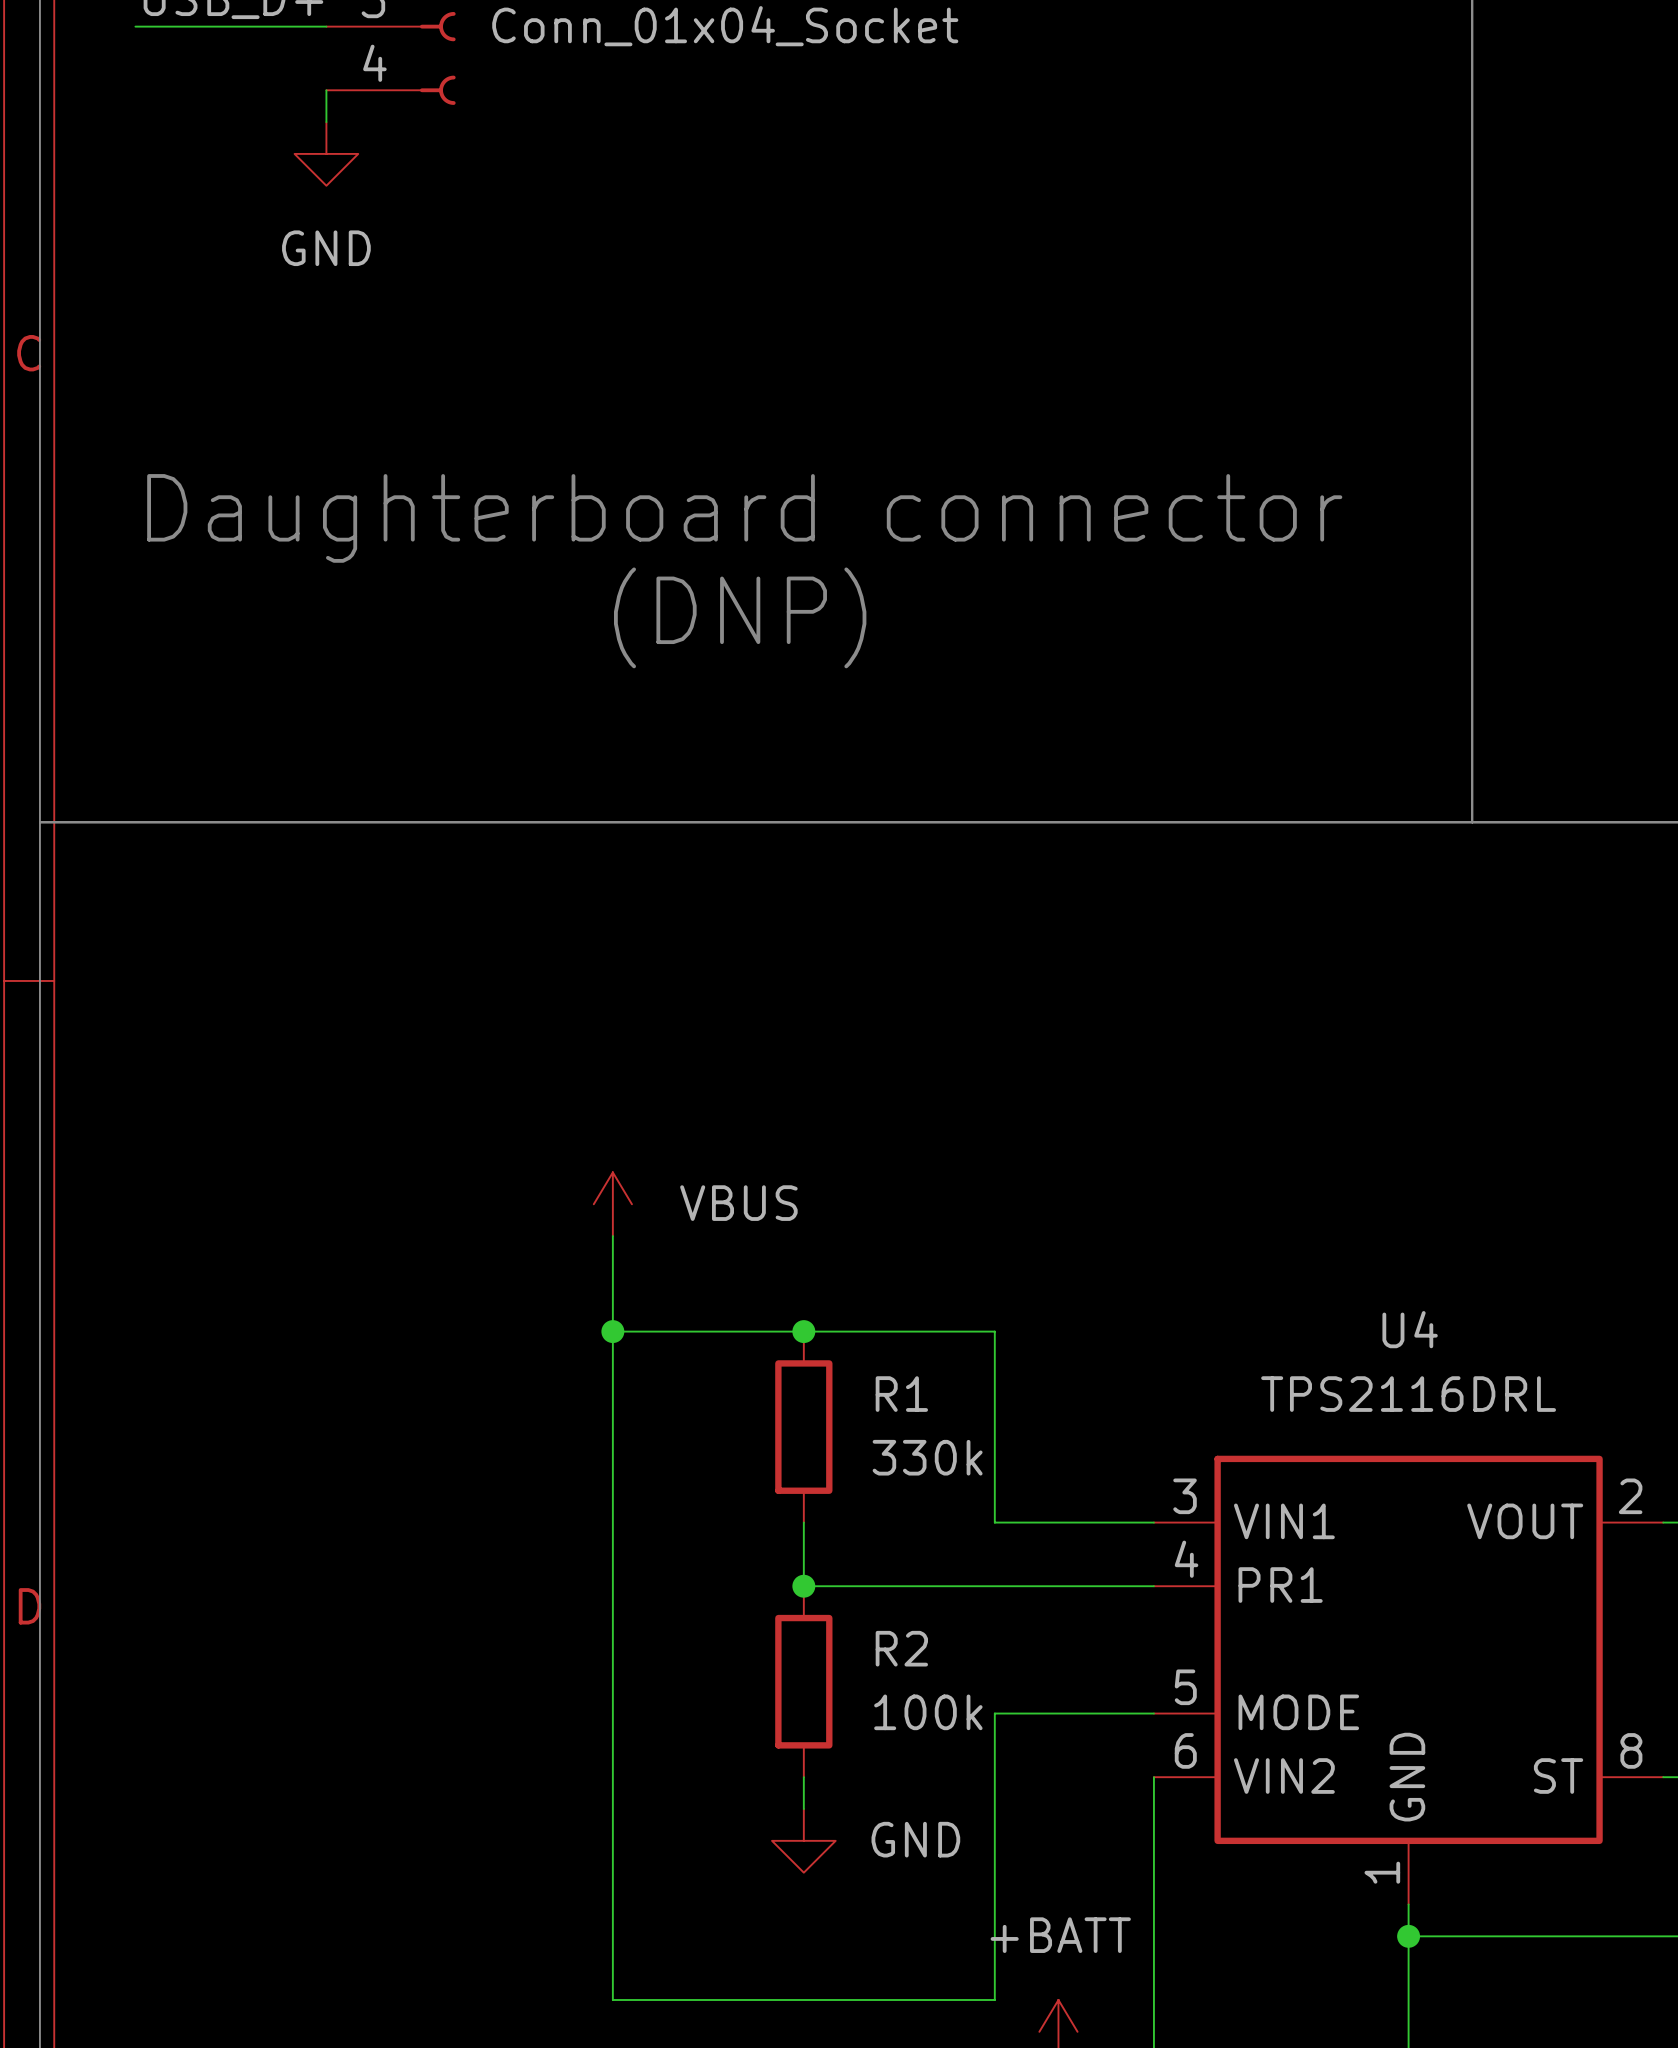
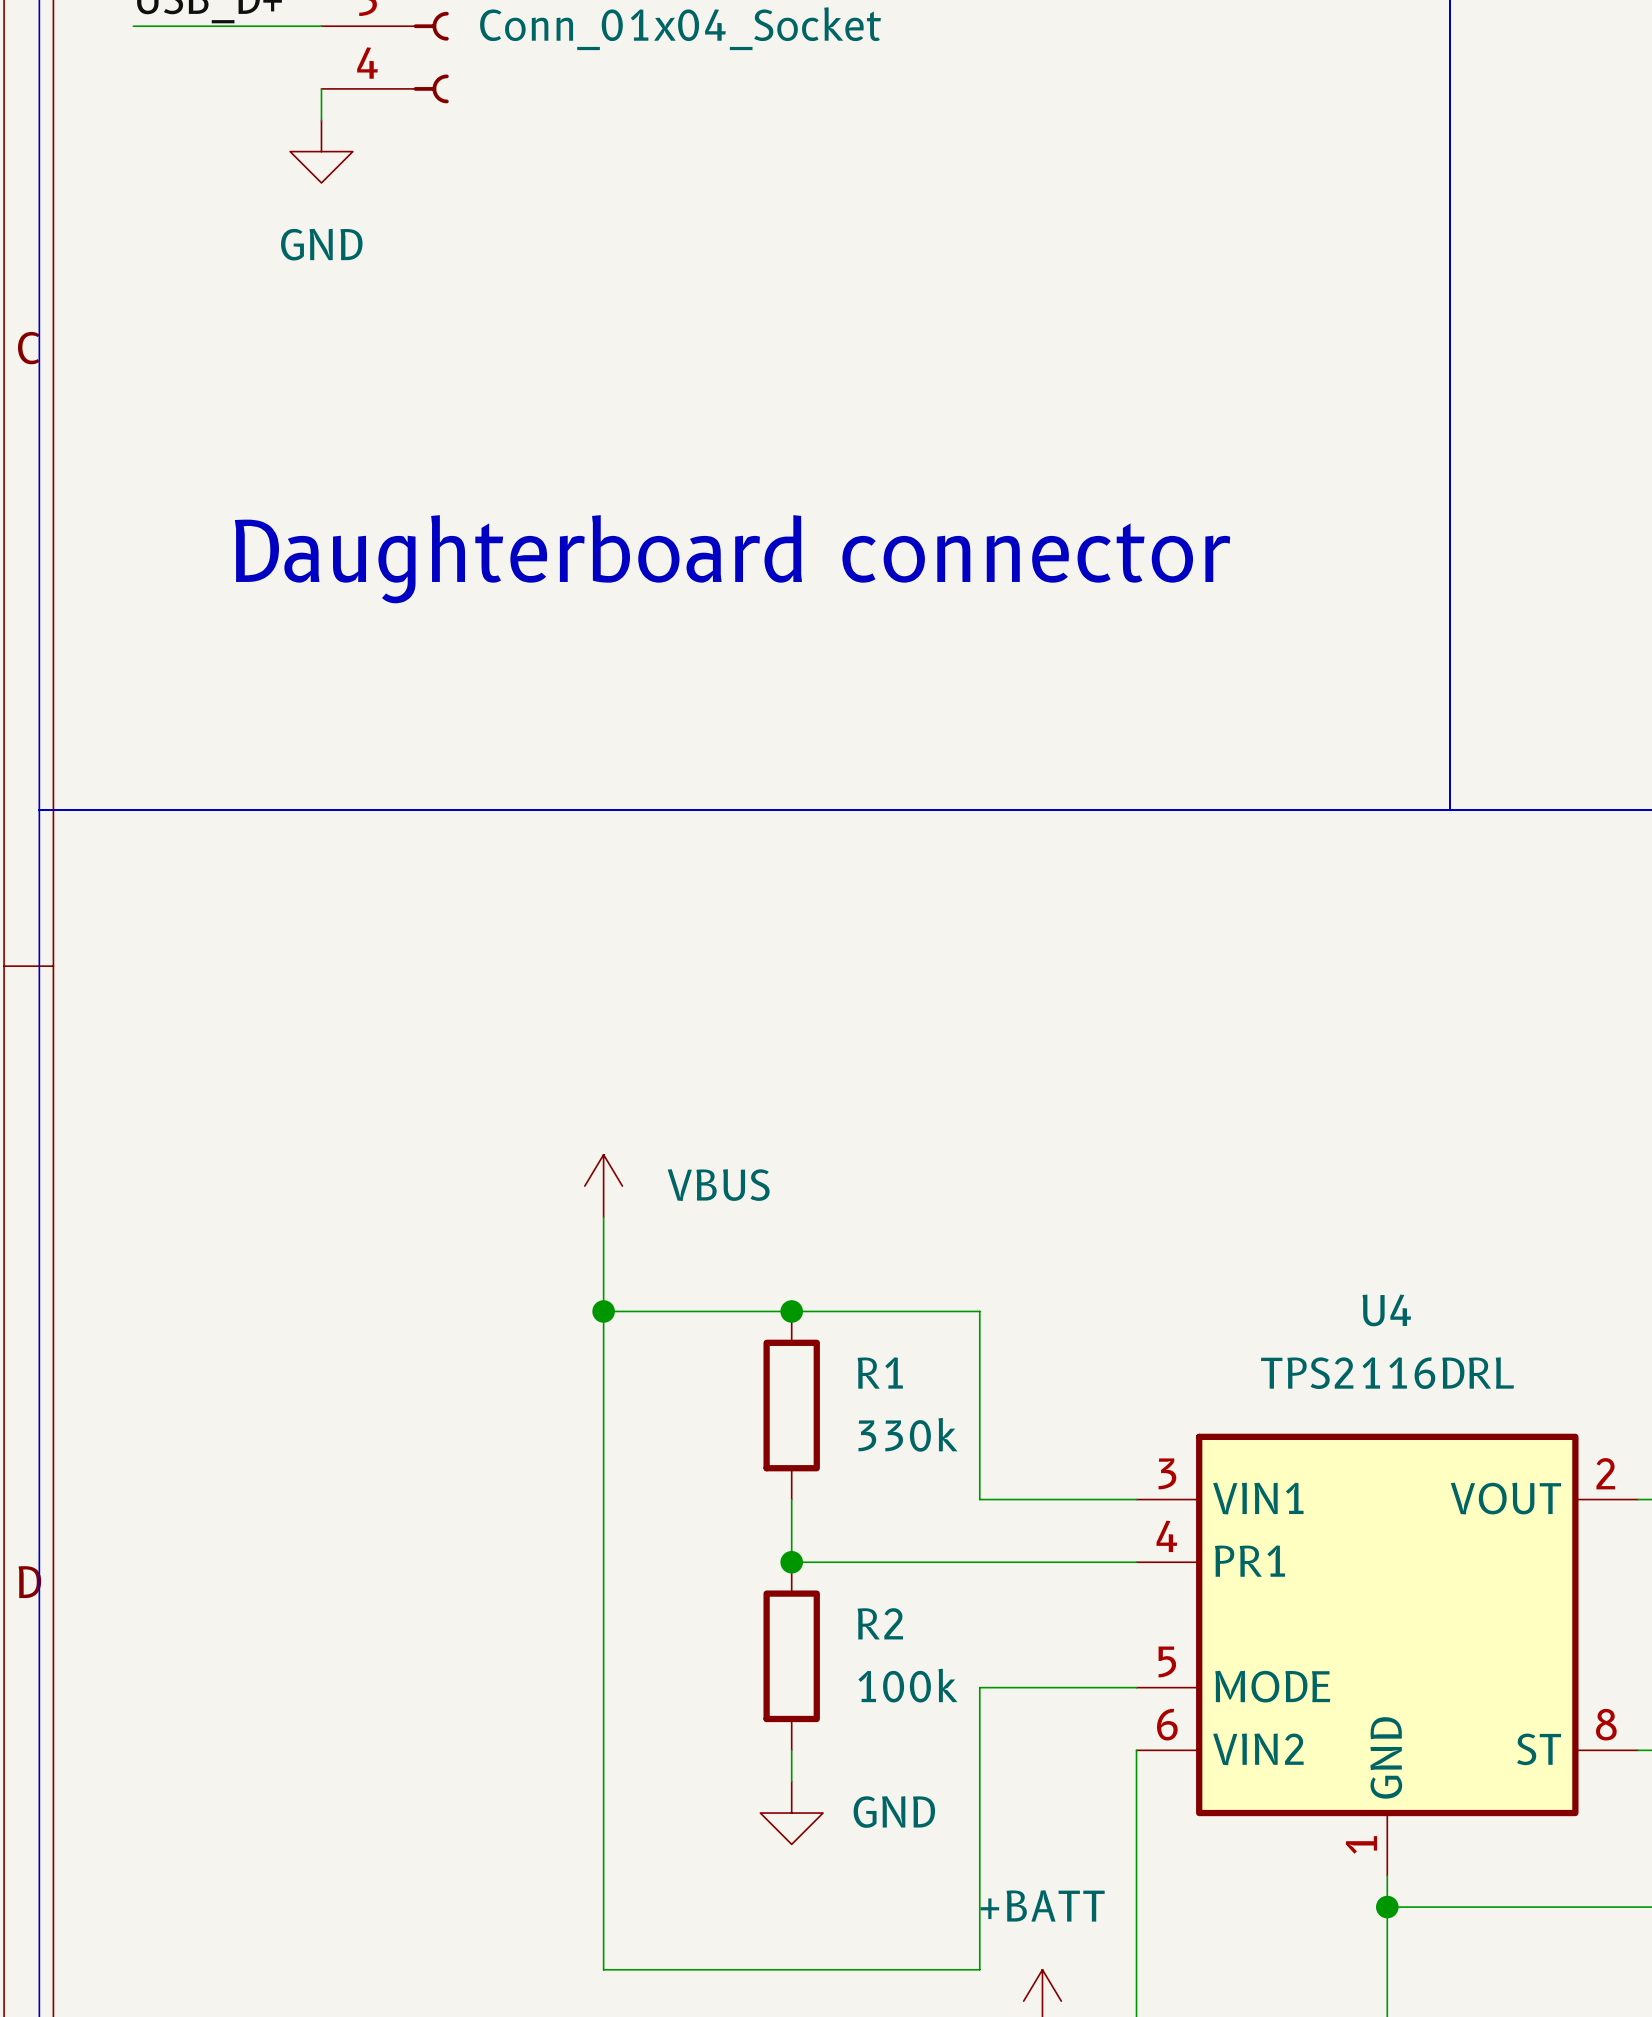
text position: Daughterboard connector (744, 518) -> Daughterboard connector (732, 559)
text: (DNP) (740, 617) -> none

